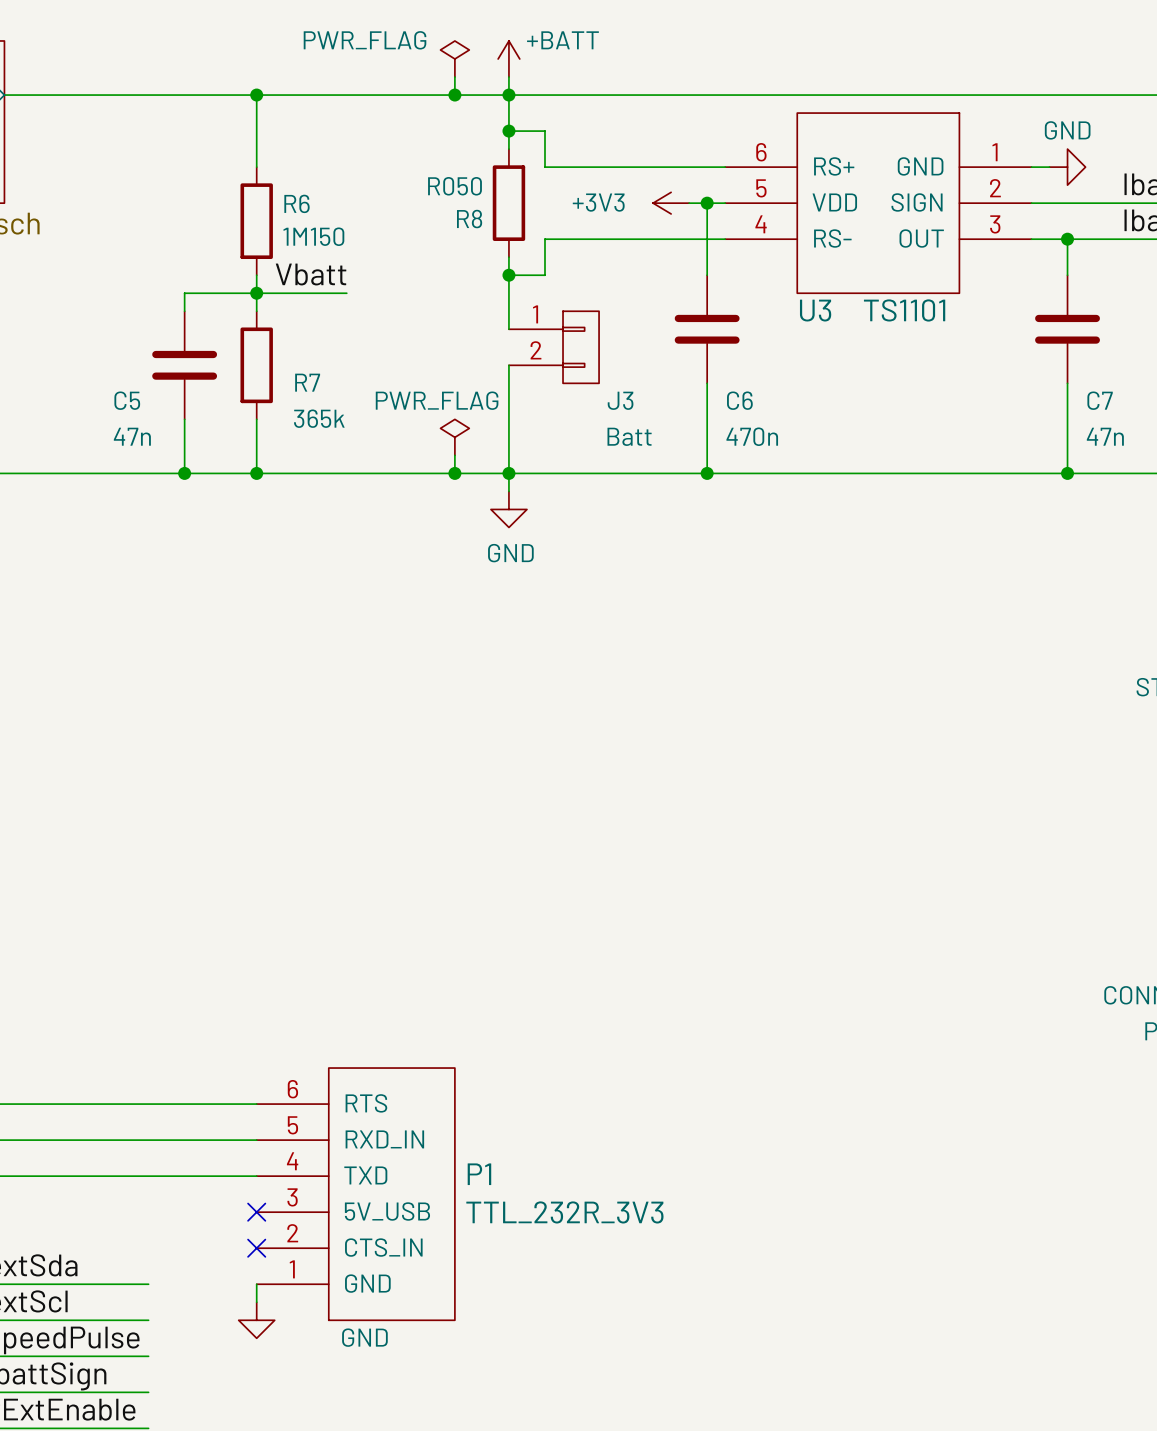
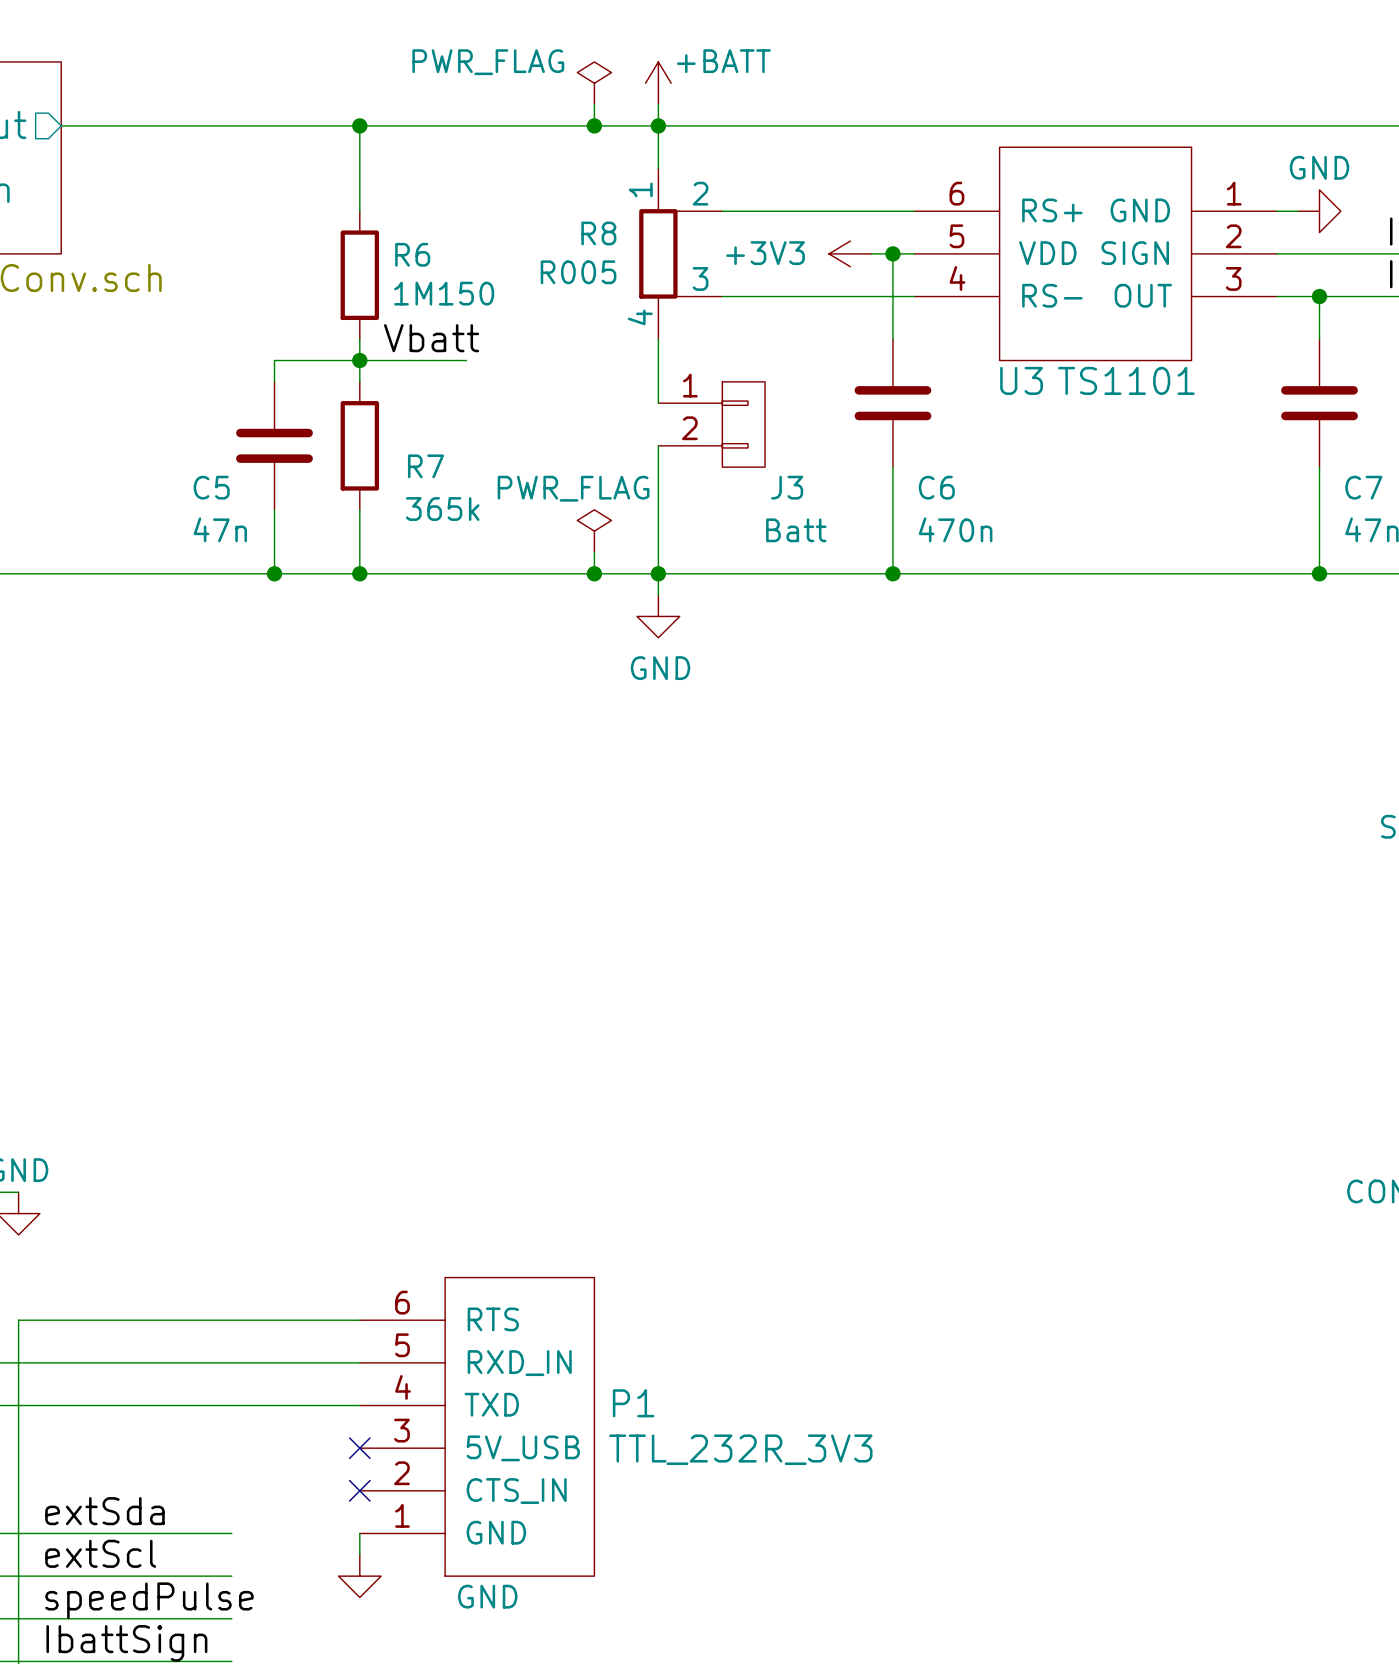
junction: (508, 131) -> none
R8 symbol: [492, 149, 526, 258] -> [639, 168, 723, 340]
wire: (508, 149) (508, 131) (544, 131) (544, 167) (563, 167) -> none
R8 value: R050 (454, 186) -> R005 (578, 272)
R8 name position: R8 (469, 219) -> R8 (598, 233)
wire: (563, 239) (544, 239) (544, 275) (508, 275) (508, 257) -> none
junction: (508, 275) -> none

